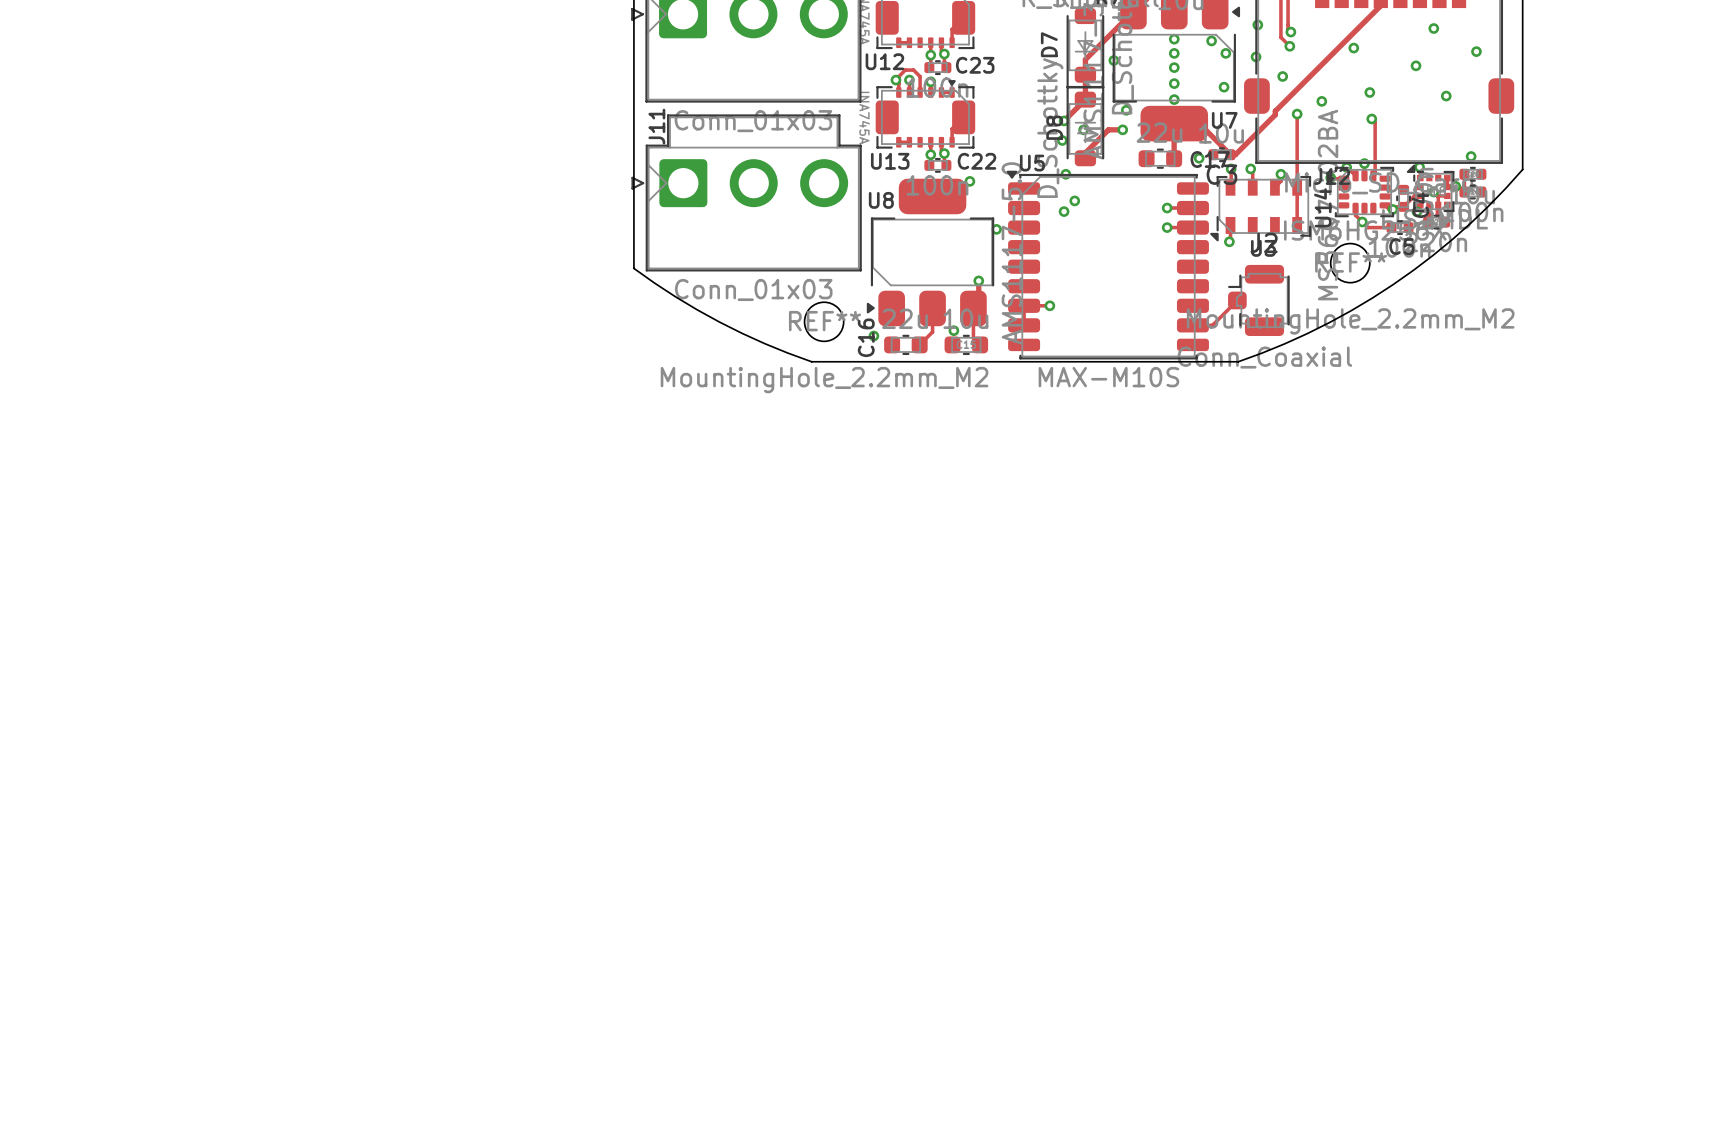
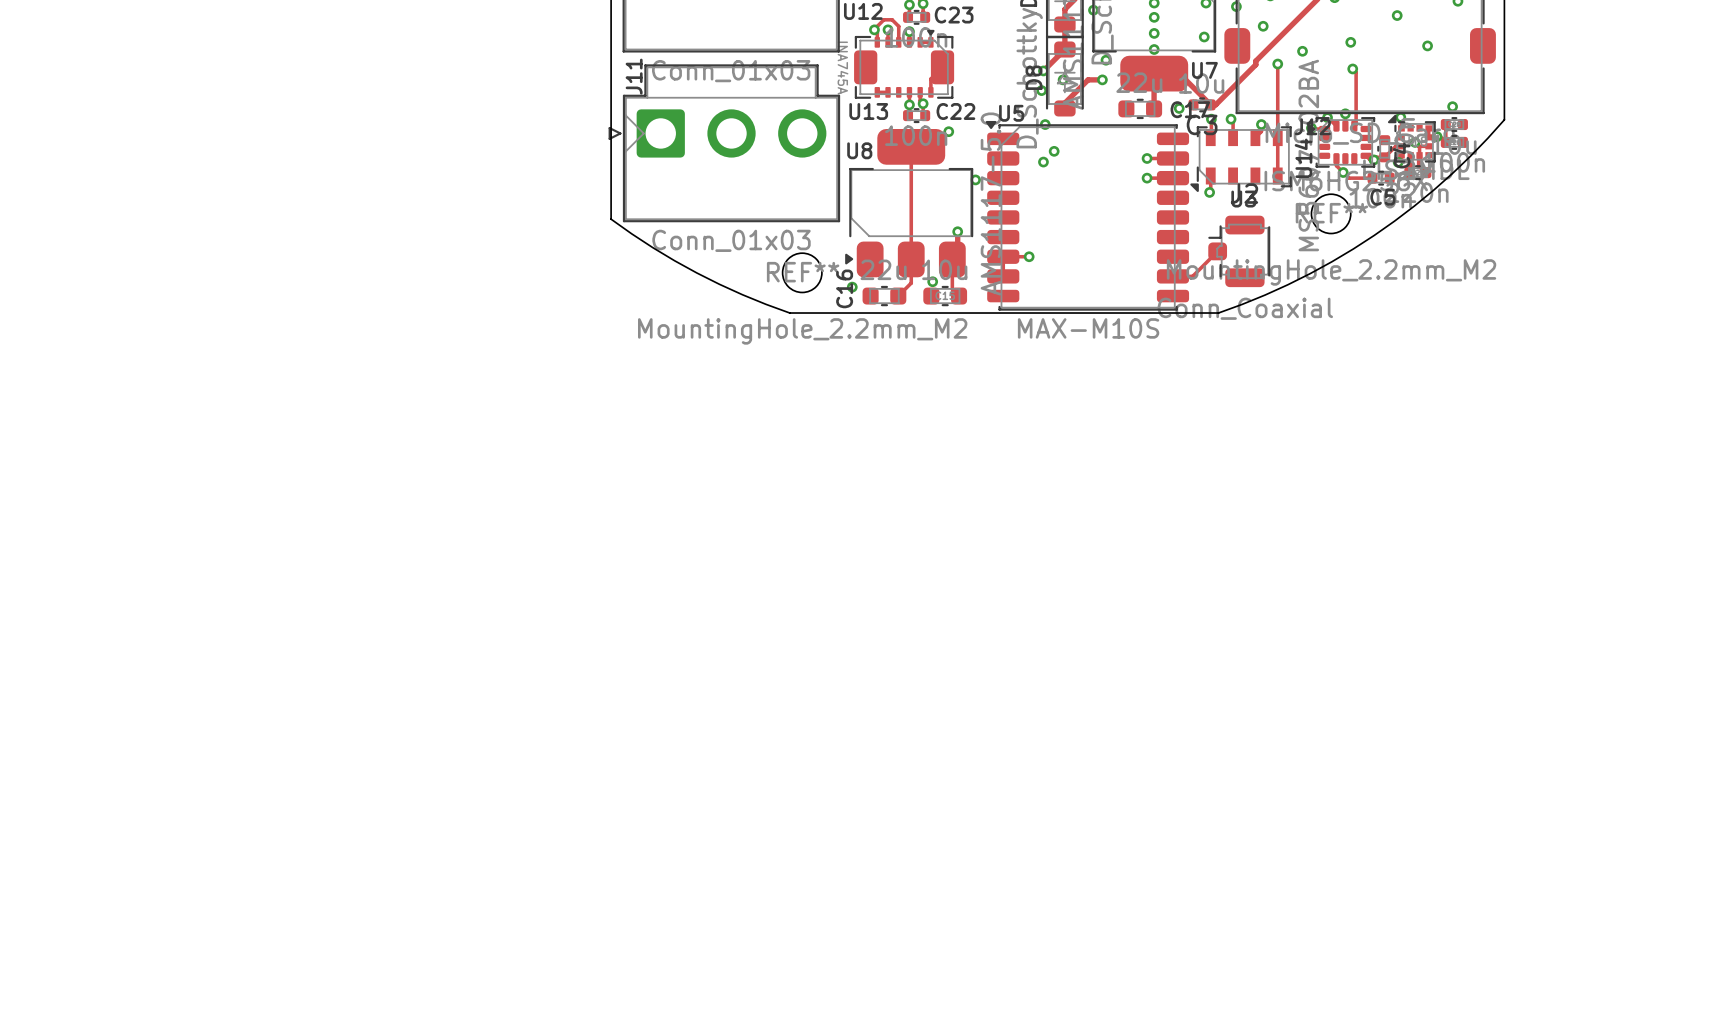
track: none -> (911, 146) (911, 259)

